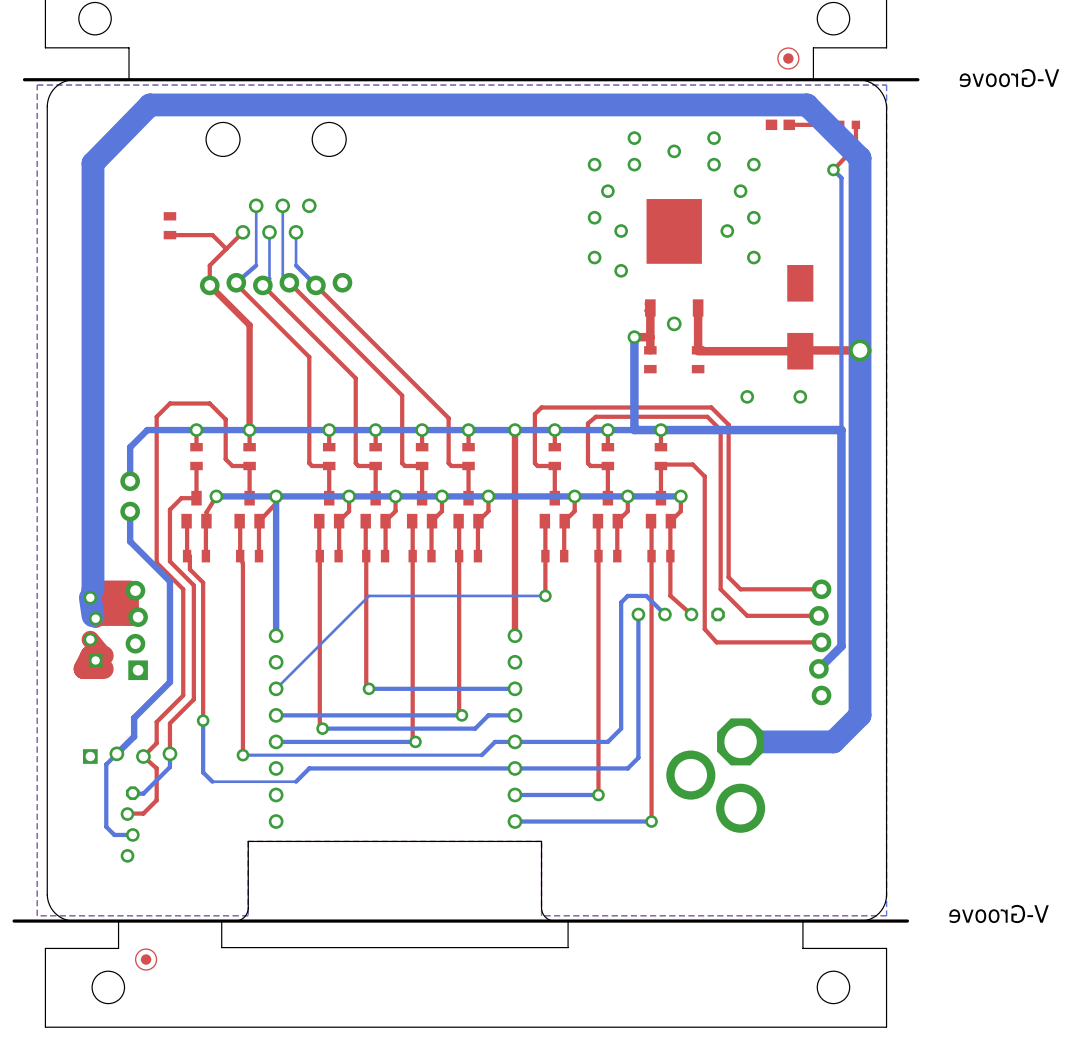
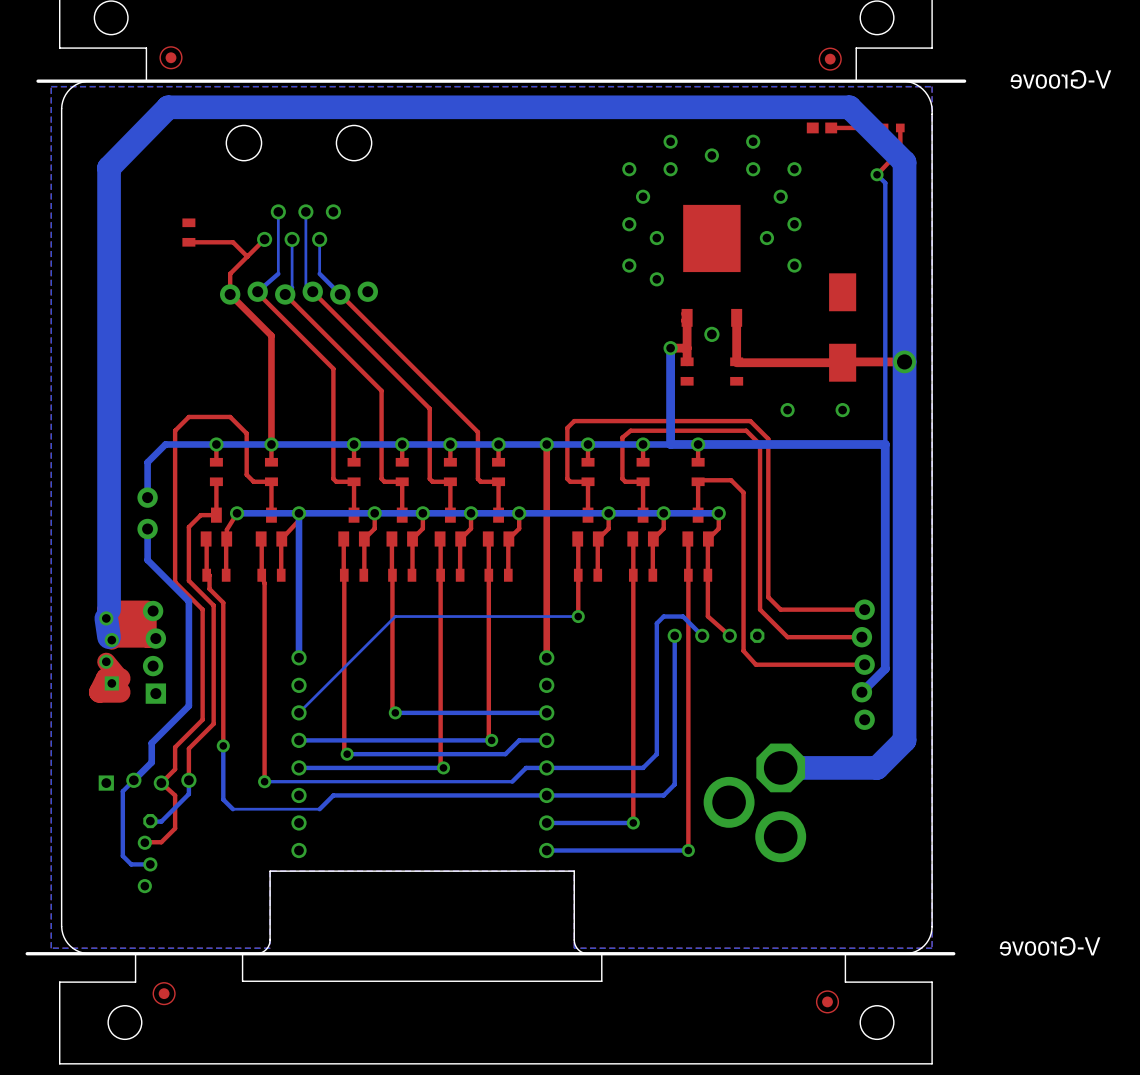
part: none -> (171, 57)
part: none -> (827, 1001)

